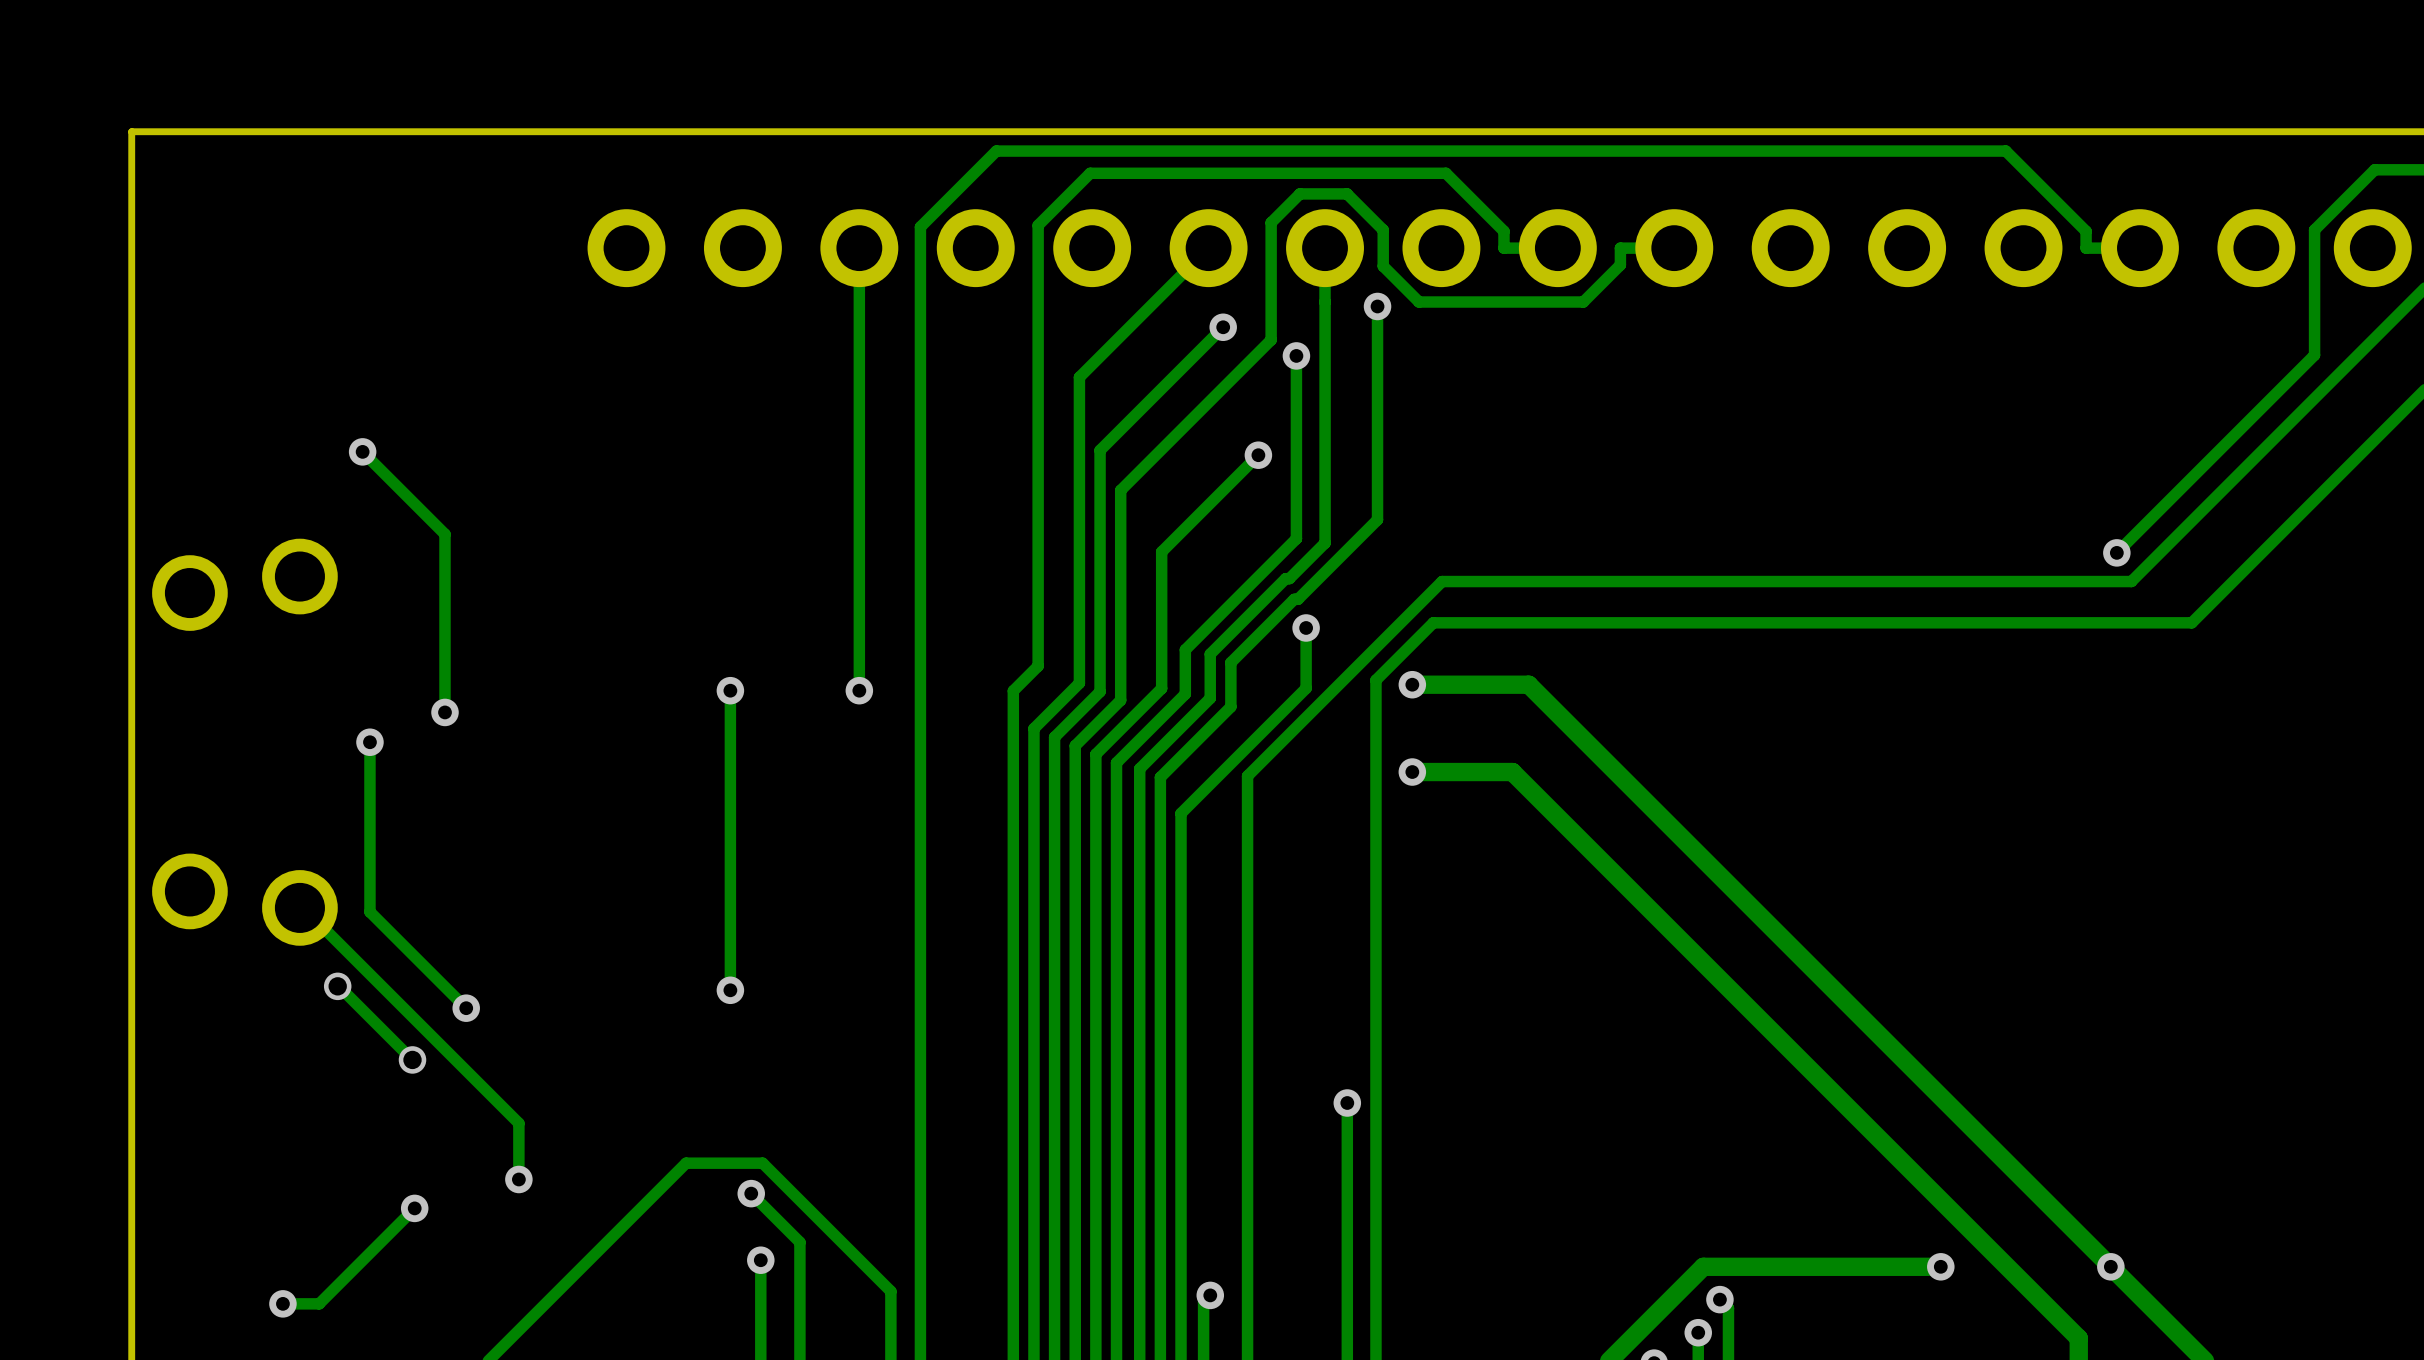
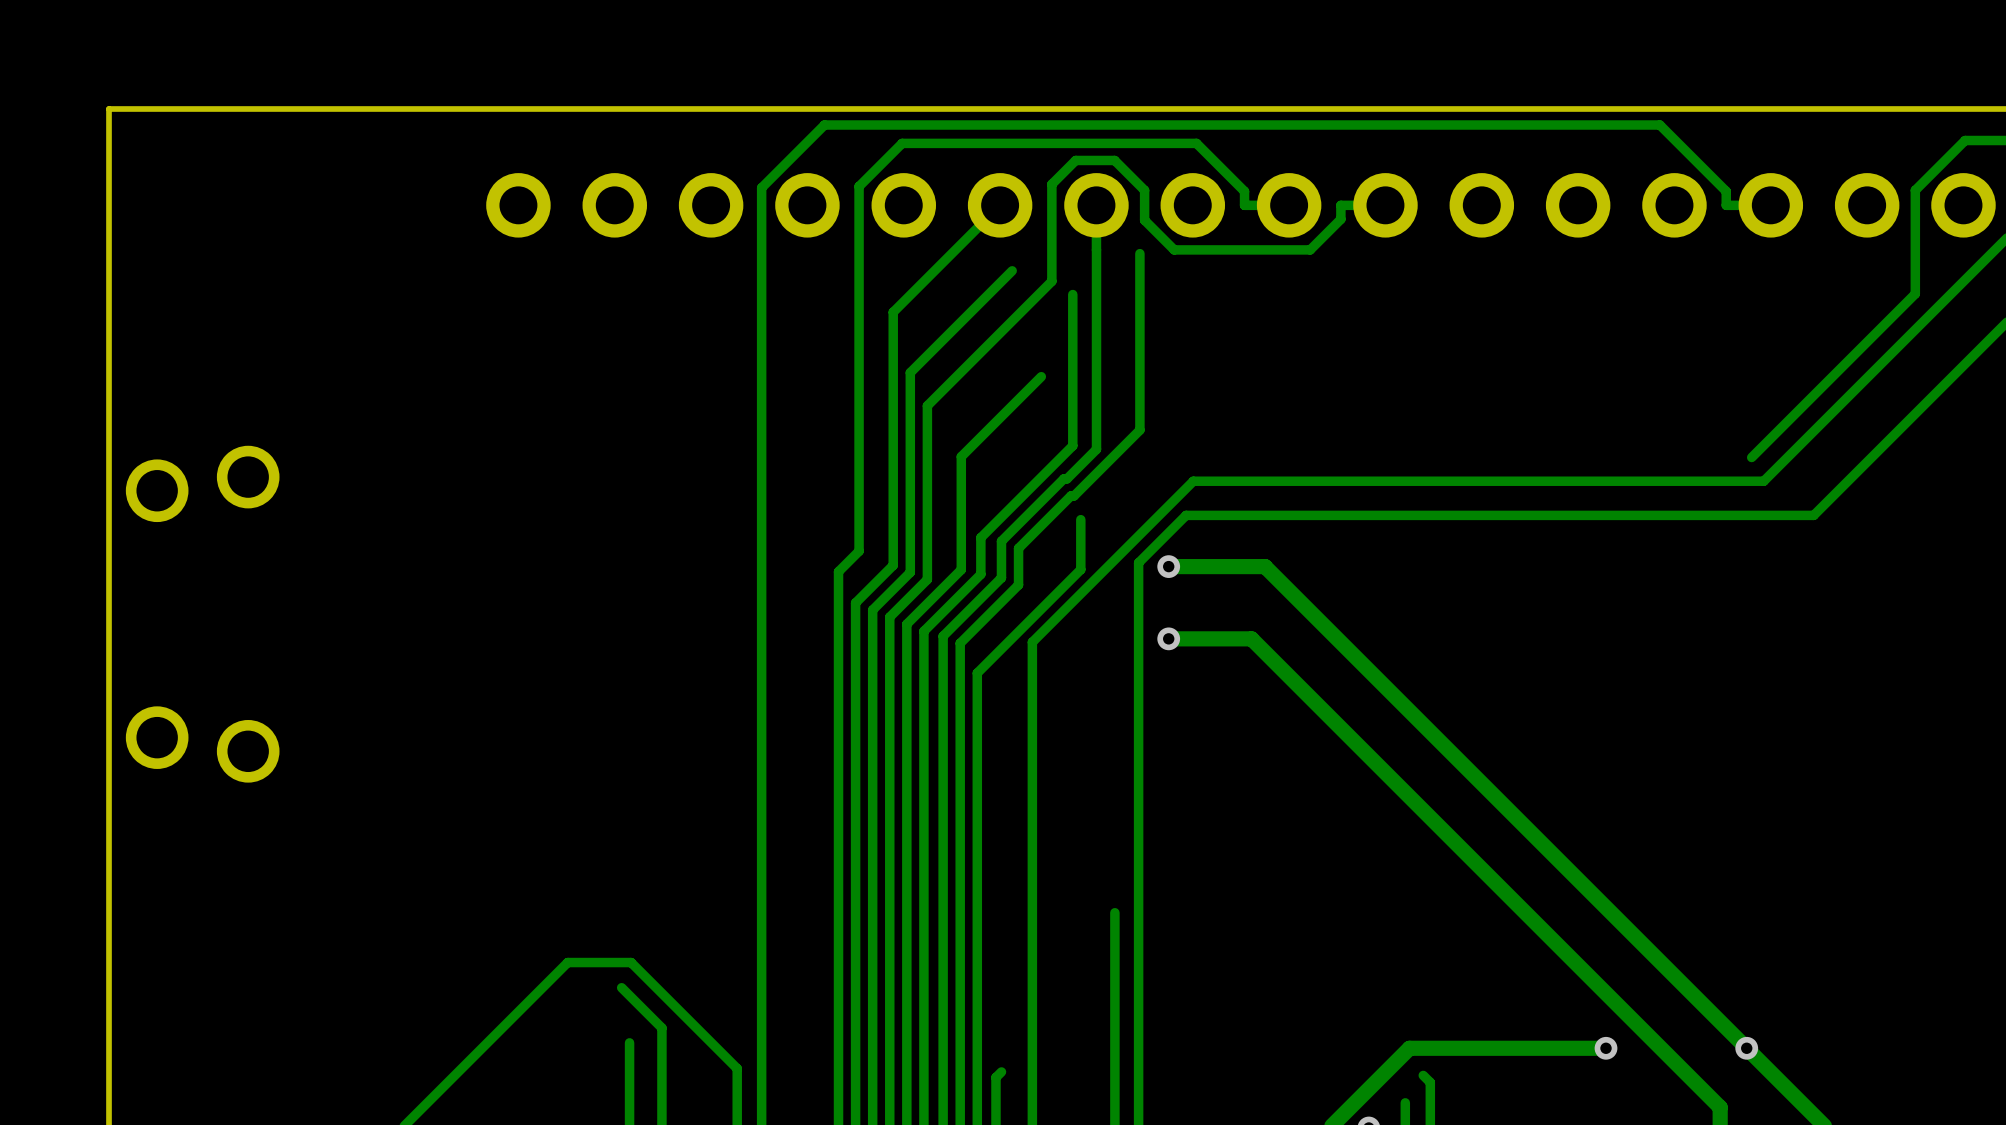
track: (859, 248) (859, 690) -> none
via: (1377, 306) -> none
via: (1223, 327) -> none
via: (1296, 355) -> none
track: (362, 451) (445, 534) (445, 712) -> none
via: (362, 451) -> none
via: (1258, 455) -> none
via: (2116, 552) -> none
via: (1306, 627) -> none
track: (730, 690) (730, 990) -> none
via: (730, 690) -> none
via: (859, 690) -> none
via: (445, 712) -> none
track: (369, 742) (369, 911) (466, 1008) -> none
via: (369, 742) -> none
track: (299, 907) (303, 907) (518, 1123) (518, 1179) -> none
track: (337, 986) (412, 1059) -> none
via: (337, 986) -> none
via: (730, 990) -> none
via: (466, 1008) -> none
via: (412, 1059) -> none
via: (1347, 1103) -> none
via: (518, 1179) -> none
via: (751, 1193) -> none
track: (414, 1208) (319, 1303) (282, 1303) -> none
via: (414, 1208) -> none
via: (760, 1260) -> none
via: (1210, 1295) -> none
via: (1719, 1299) -> none
via: (282, 1303) -> none
via: (1698, 1332) -> none

